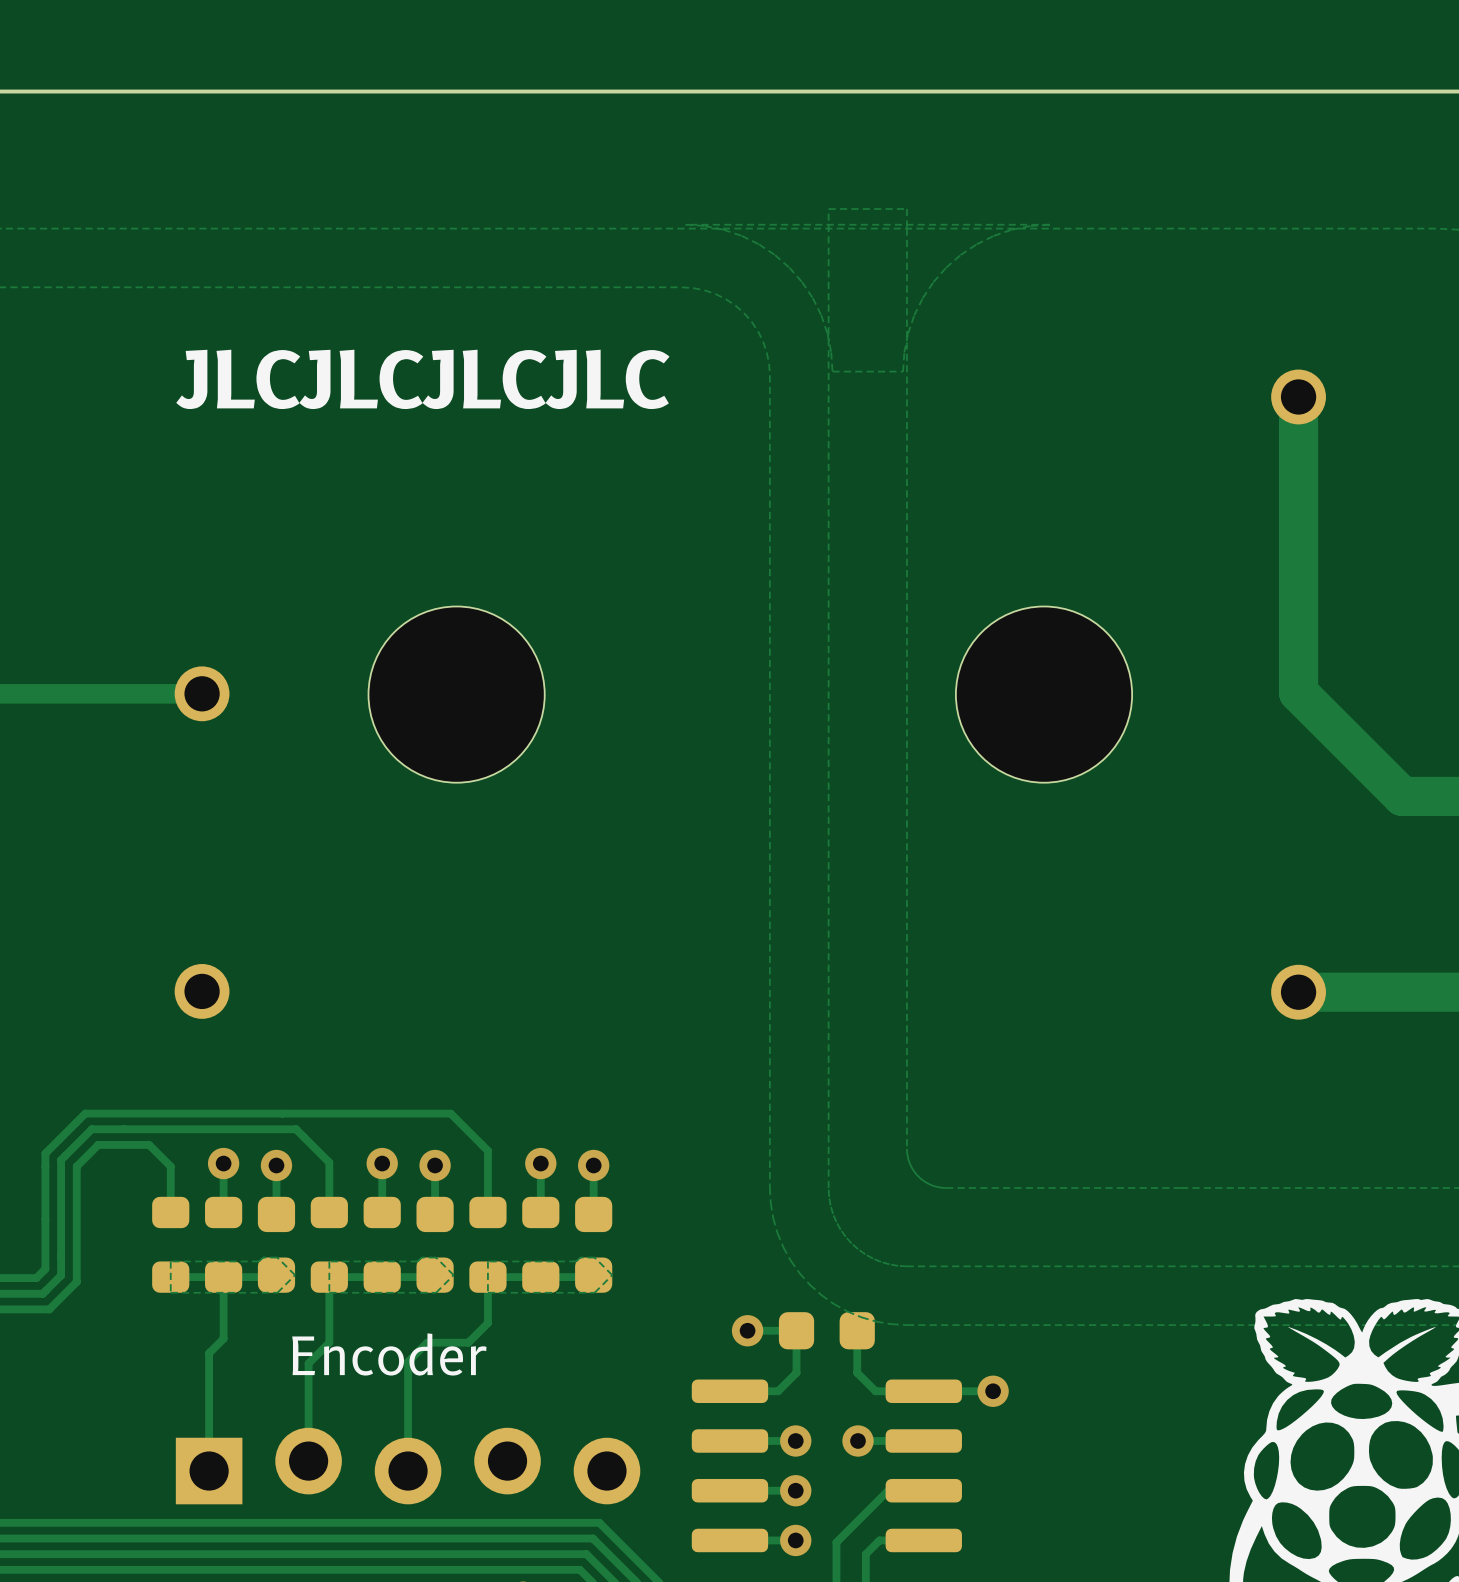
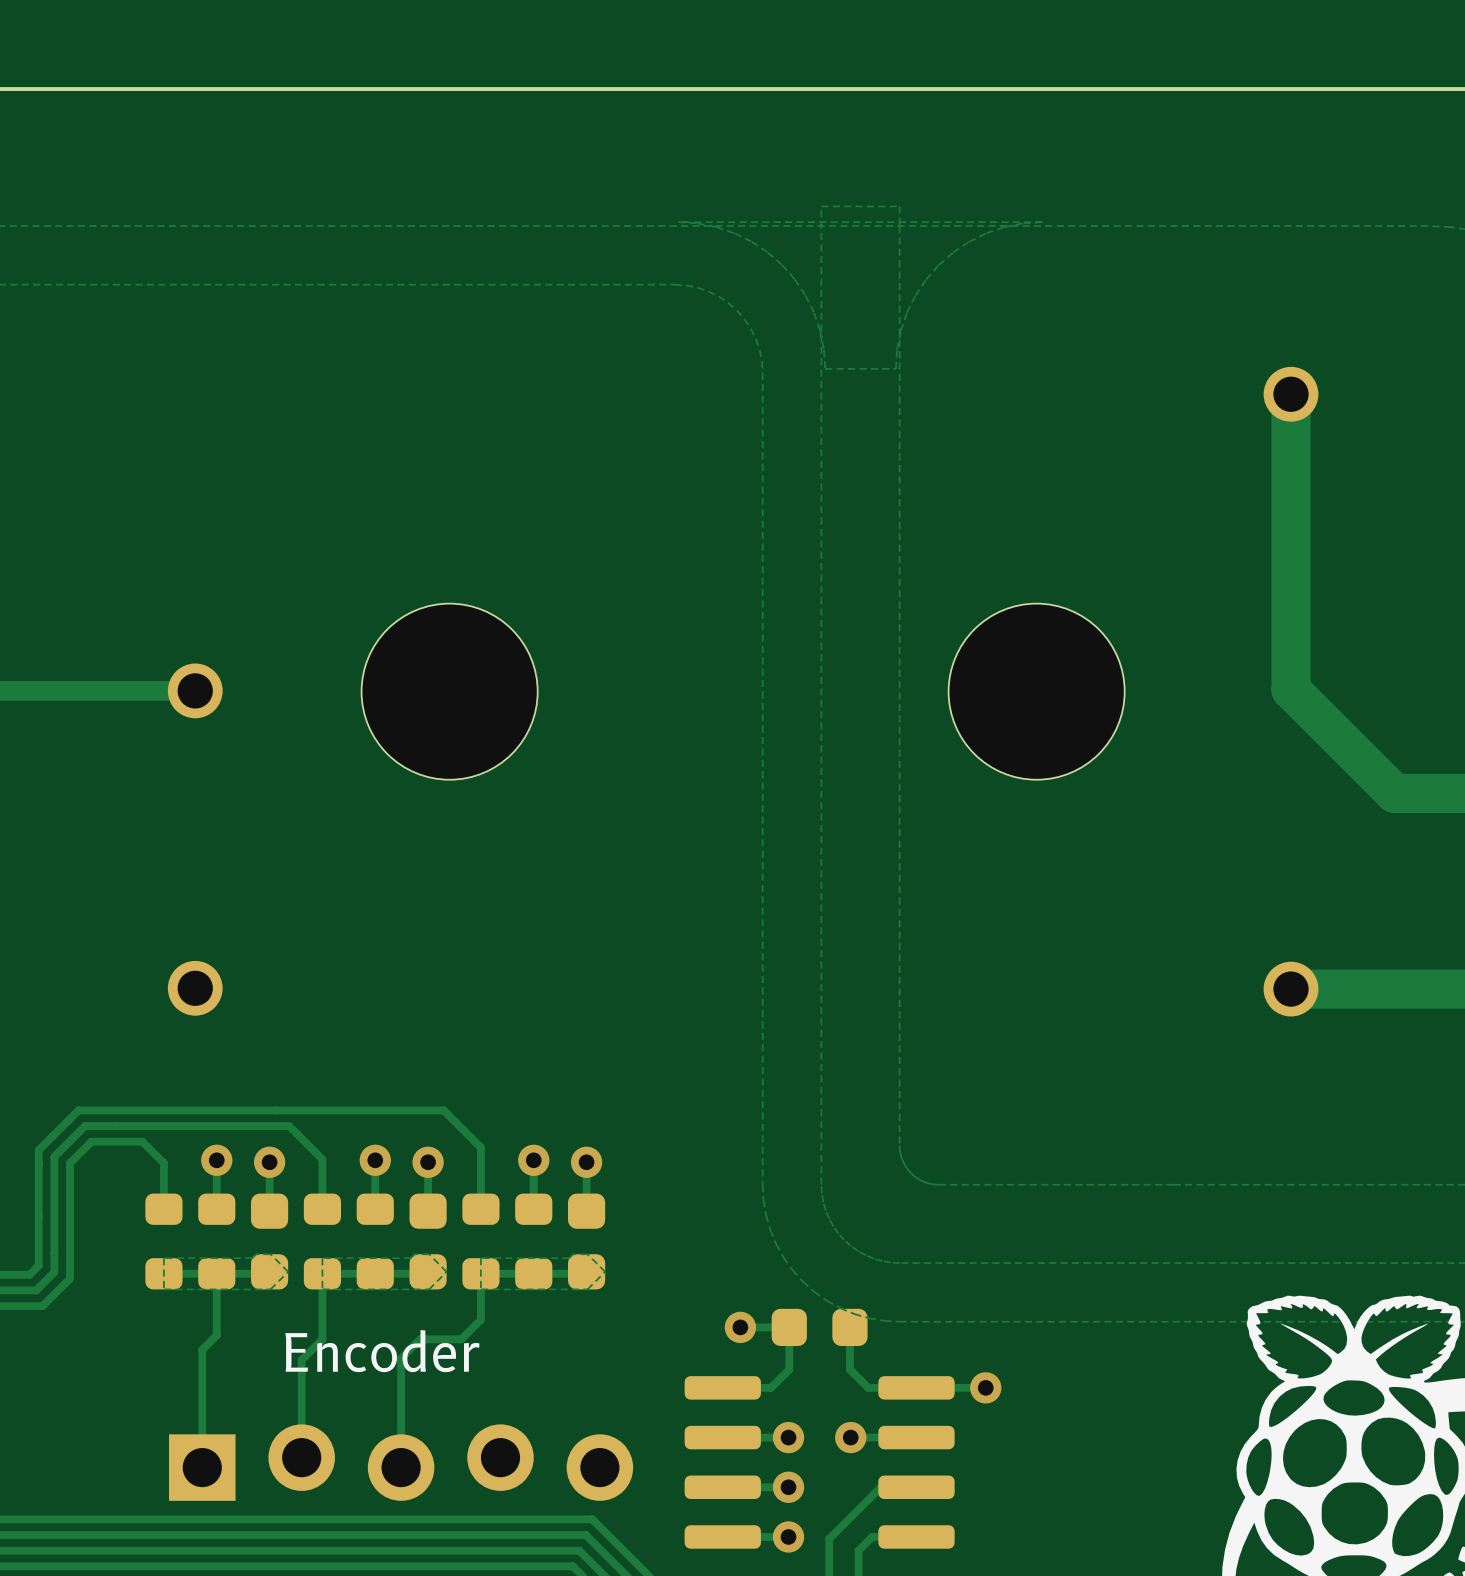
text: JLCJLCJLCJLC (422, 379) -> none

